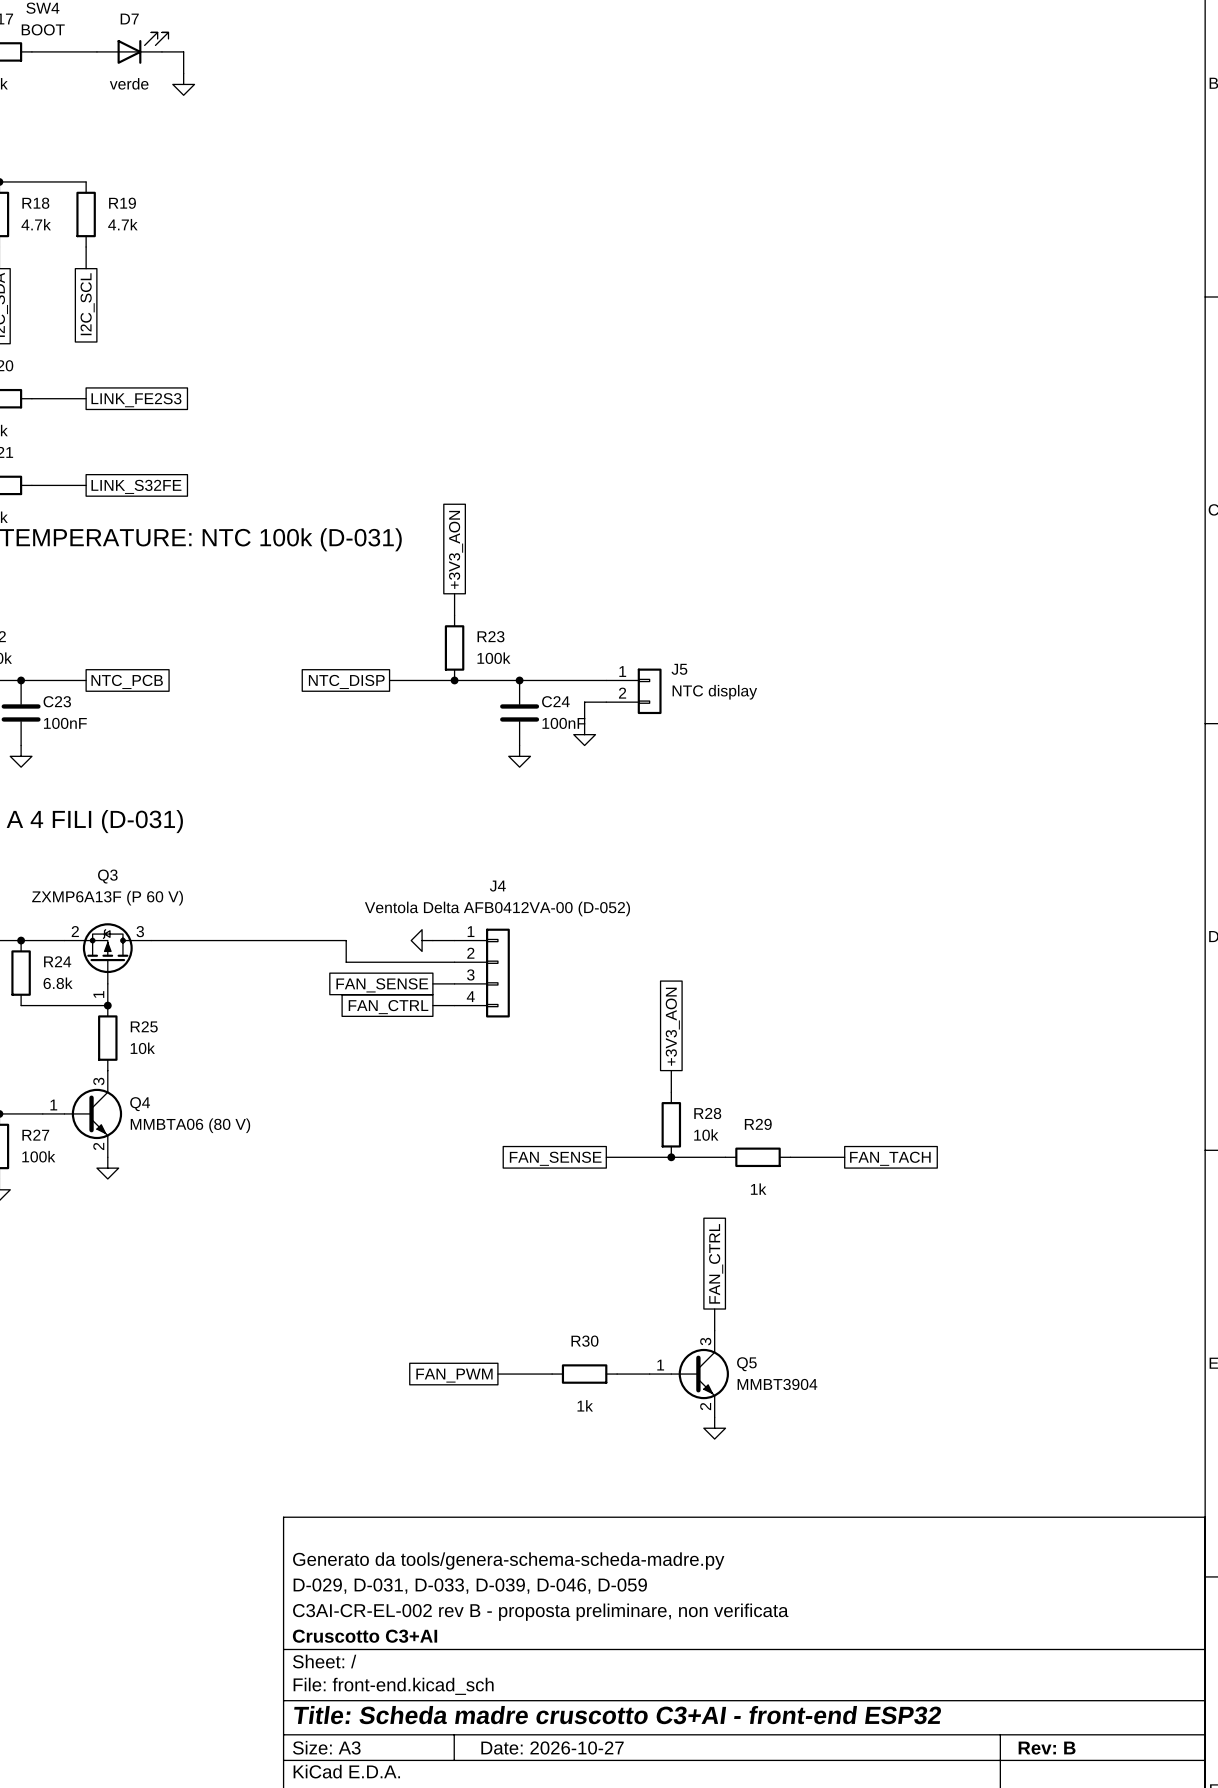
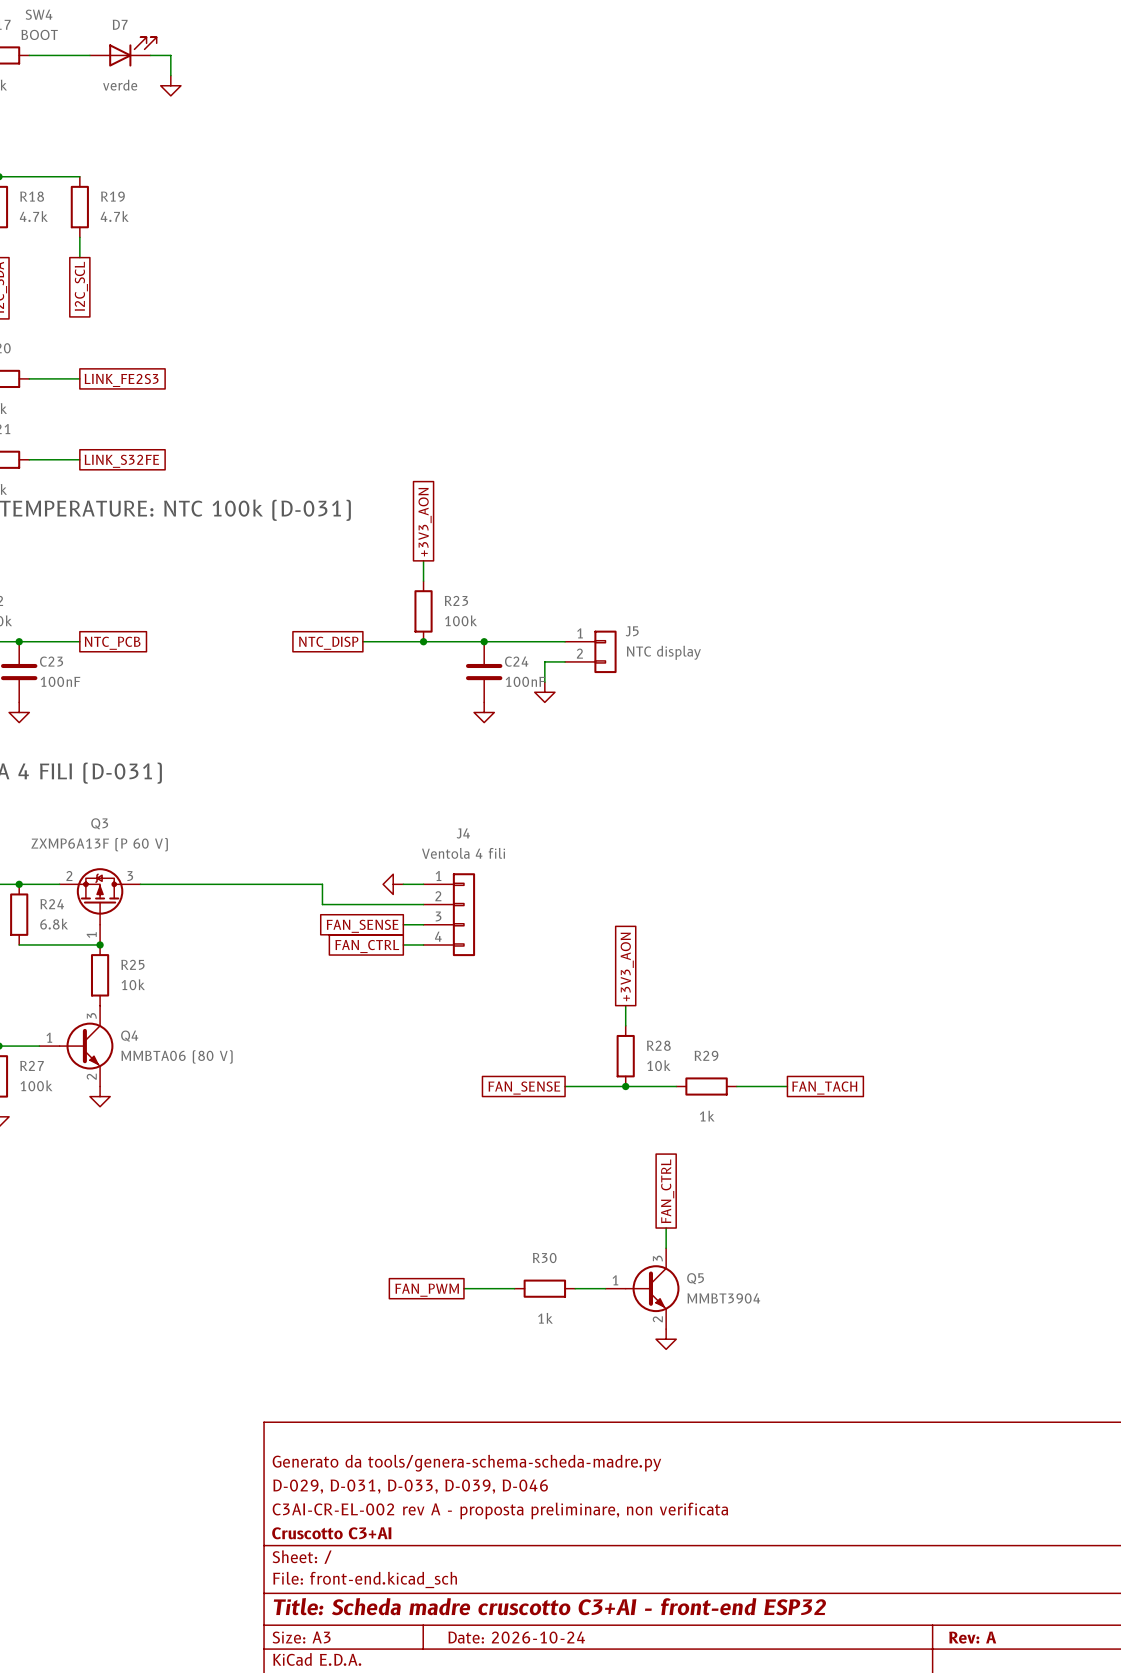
J4 value: Ventola Delta AFB0412VA-00 (D-052) (497, 908) -> Ventola 4 fili (463, 853)
title block: D-029, D-031, D-033, D-039, D-046, D-059 (470, 1586) -> D-029, D-031, D-033, D-039, D-046 (410, 1486)
title block: C3AI-CR-EL-002 rev B - proposta preliminare, non verificata (540, 1612) -> C3AI-CR-EL-002 rev A - proposta preliminare, non verificata (500, 1510)
title block: Date: 2026-10-27 (552, 1747) -> Date: 2026-10-24 (516, 1637)
title block: Rev: B (1047, 1748) -> Rev: A (972, 1637)

